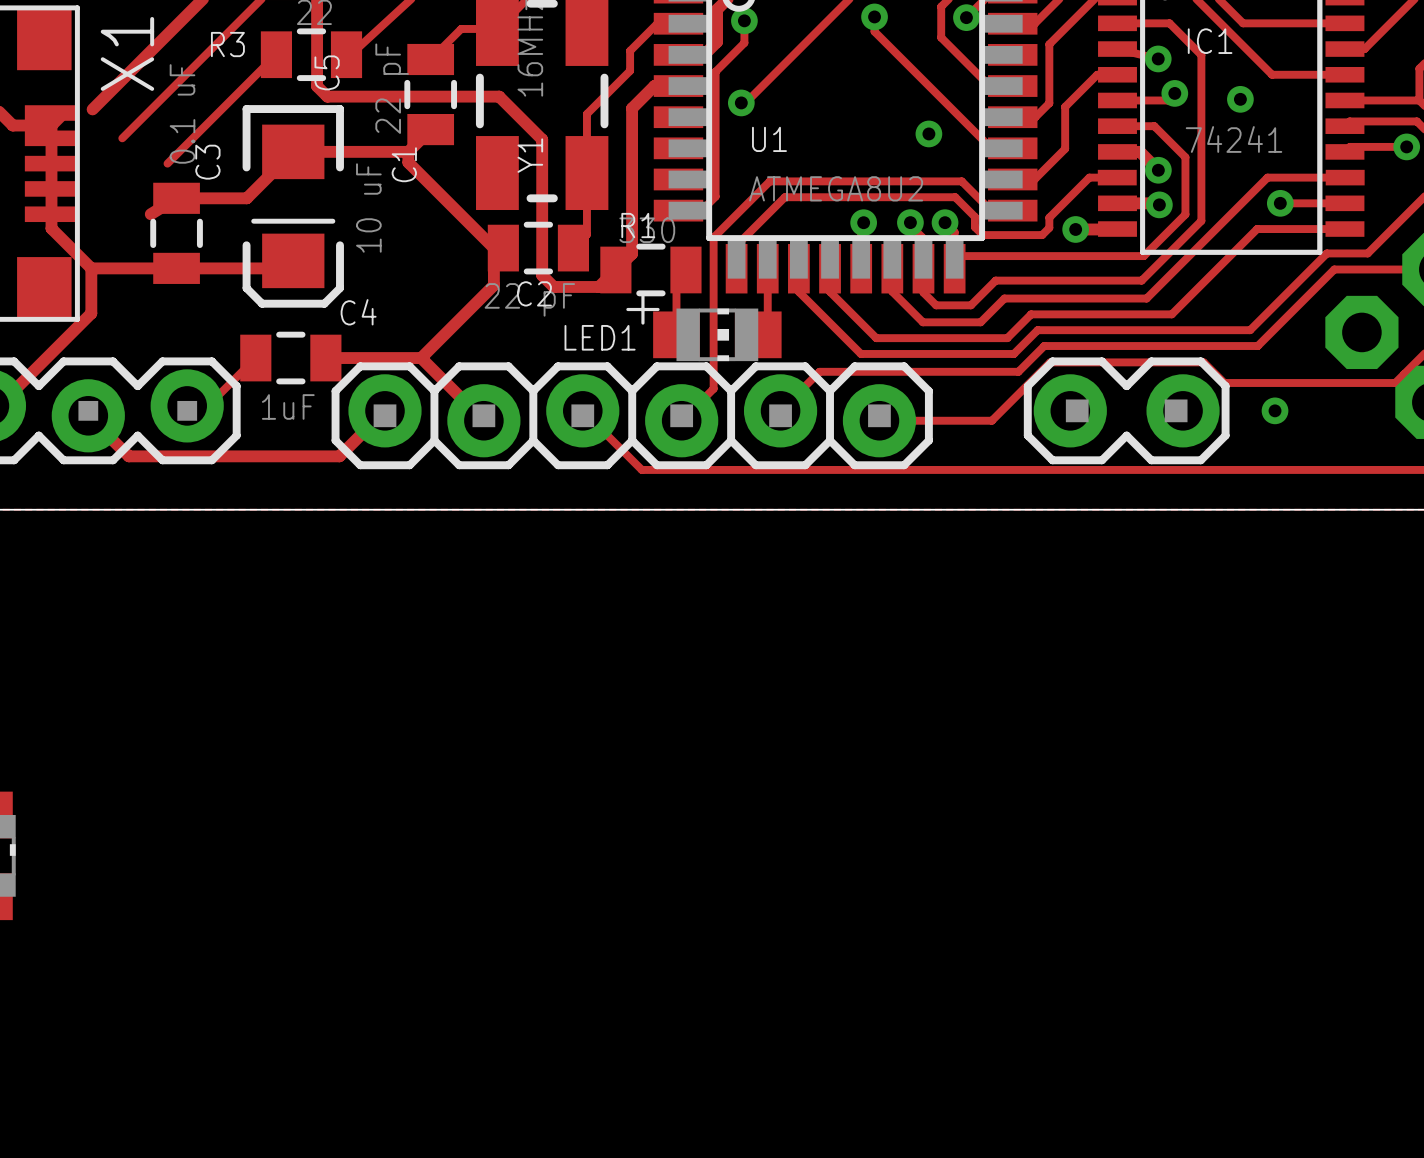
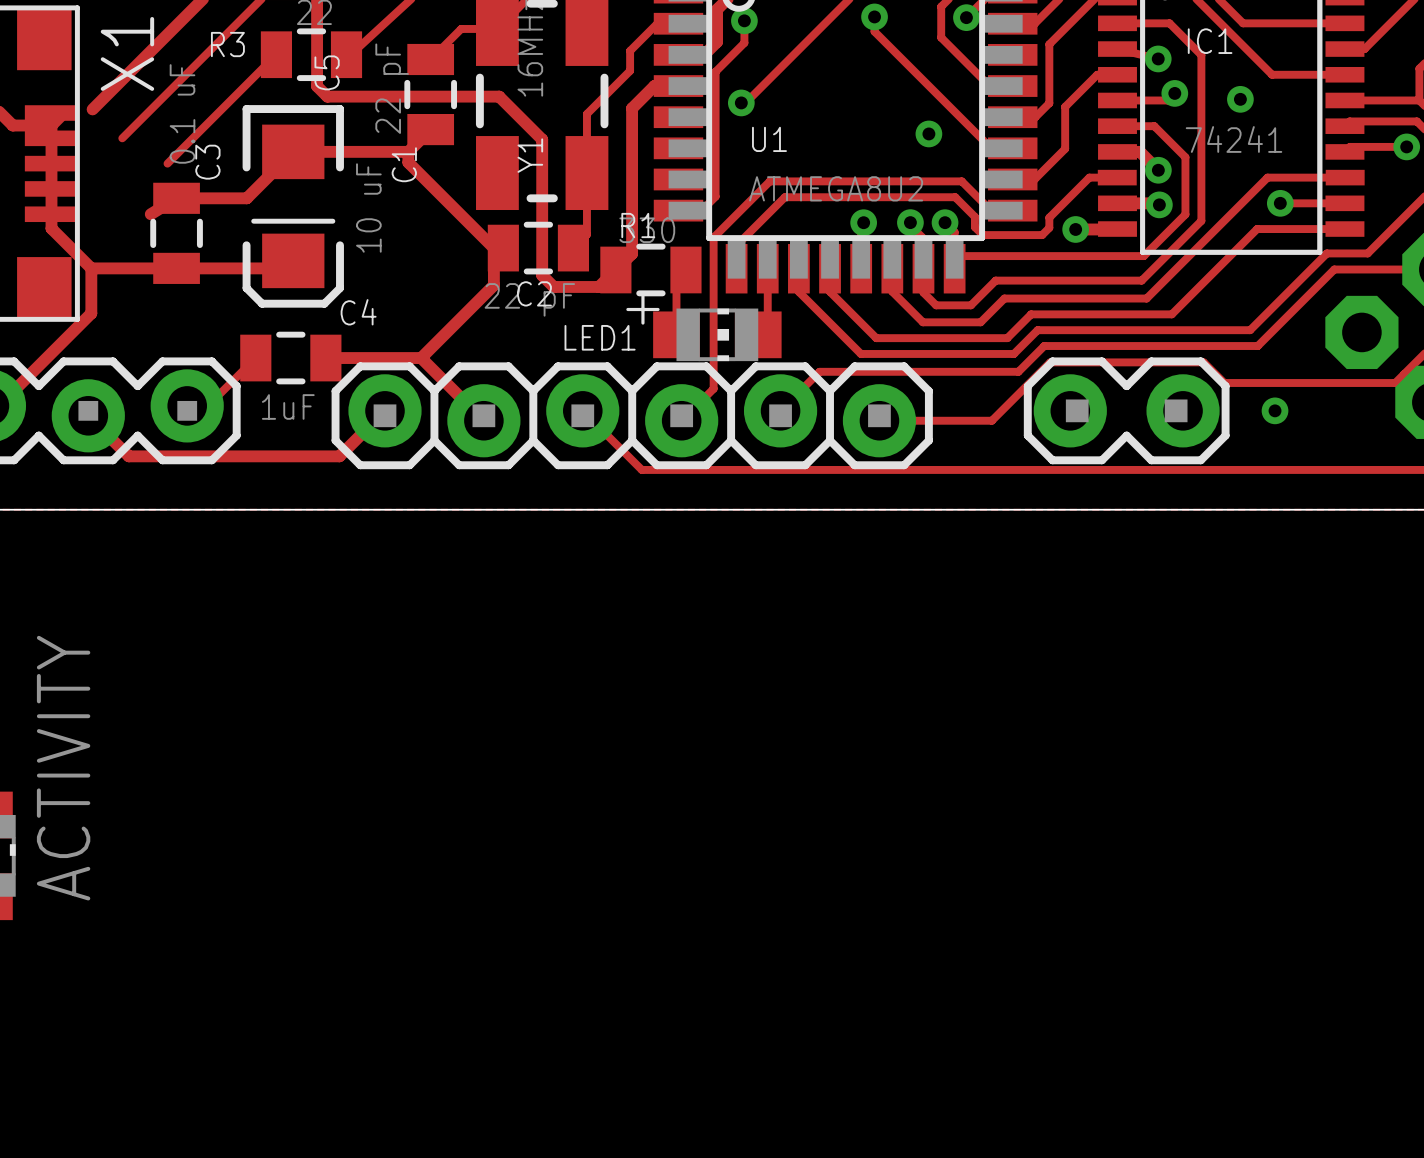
part value: none -> ACTIVITY (63, 768)

